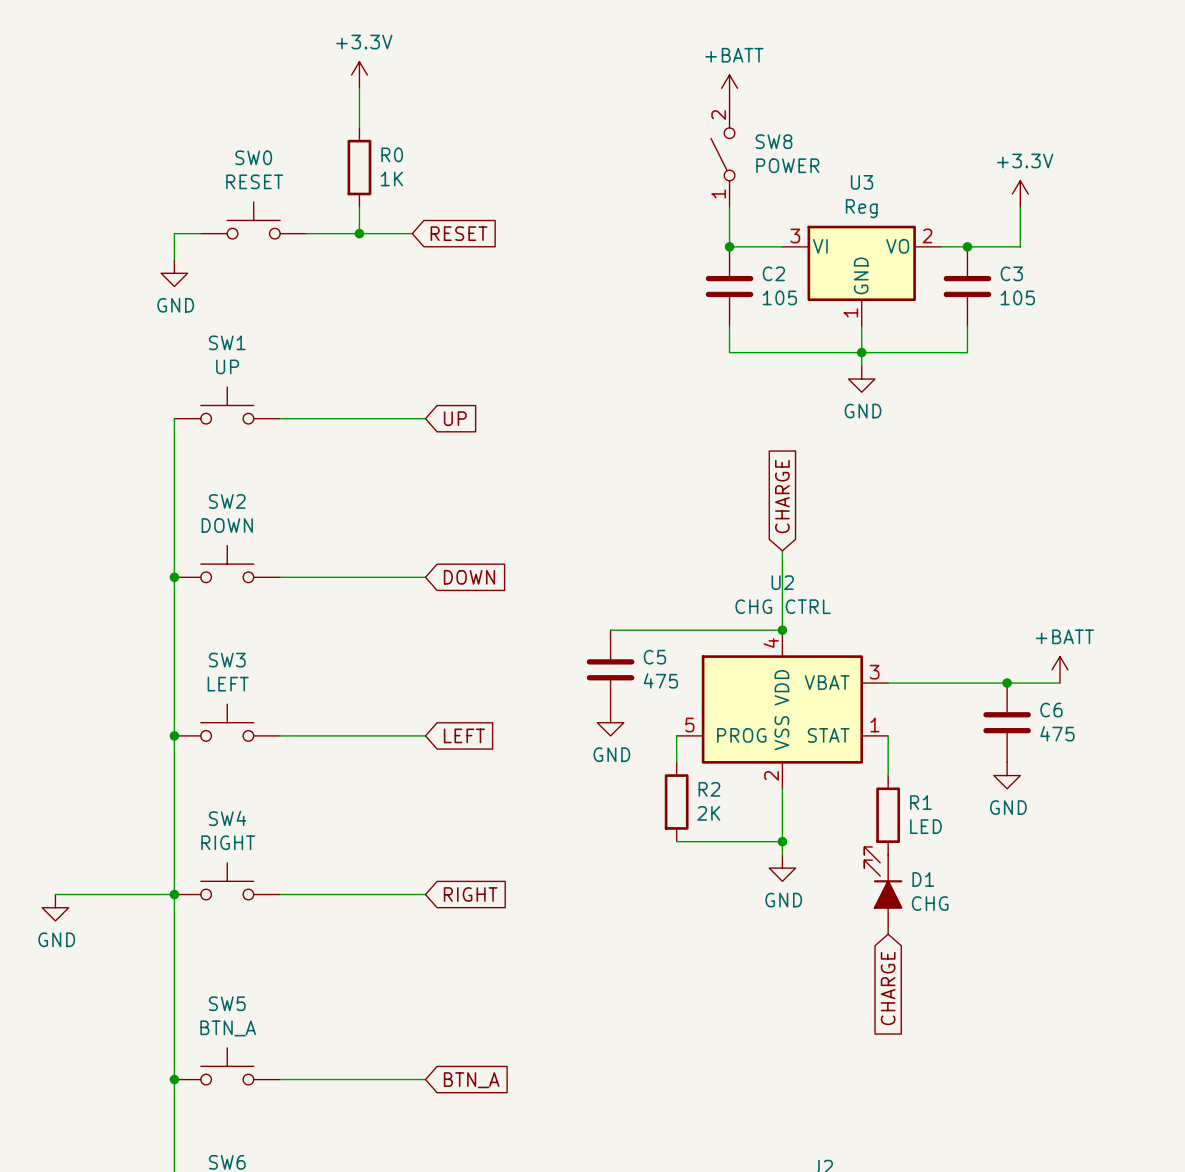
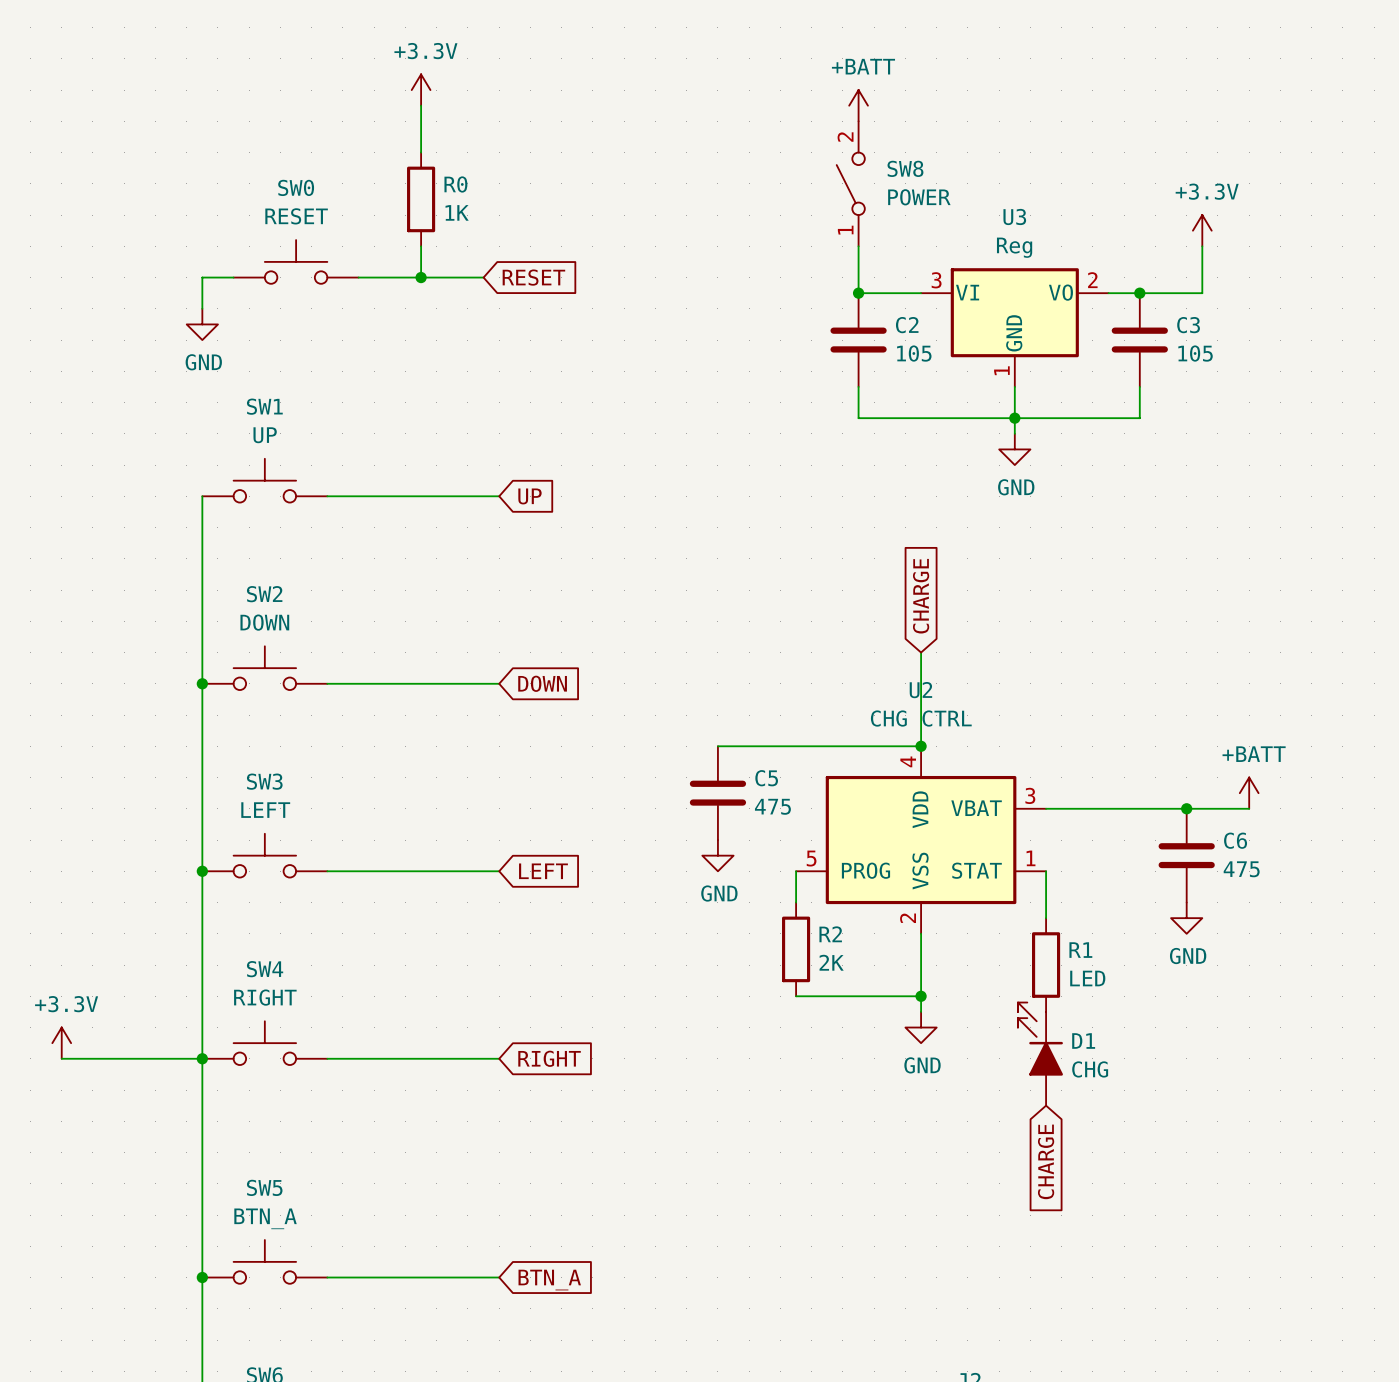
power symbol: none -> +3.3V (61, 1043)
power symbol: GND (55, 907) -> none

